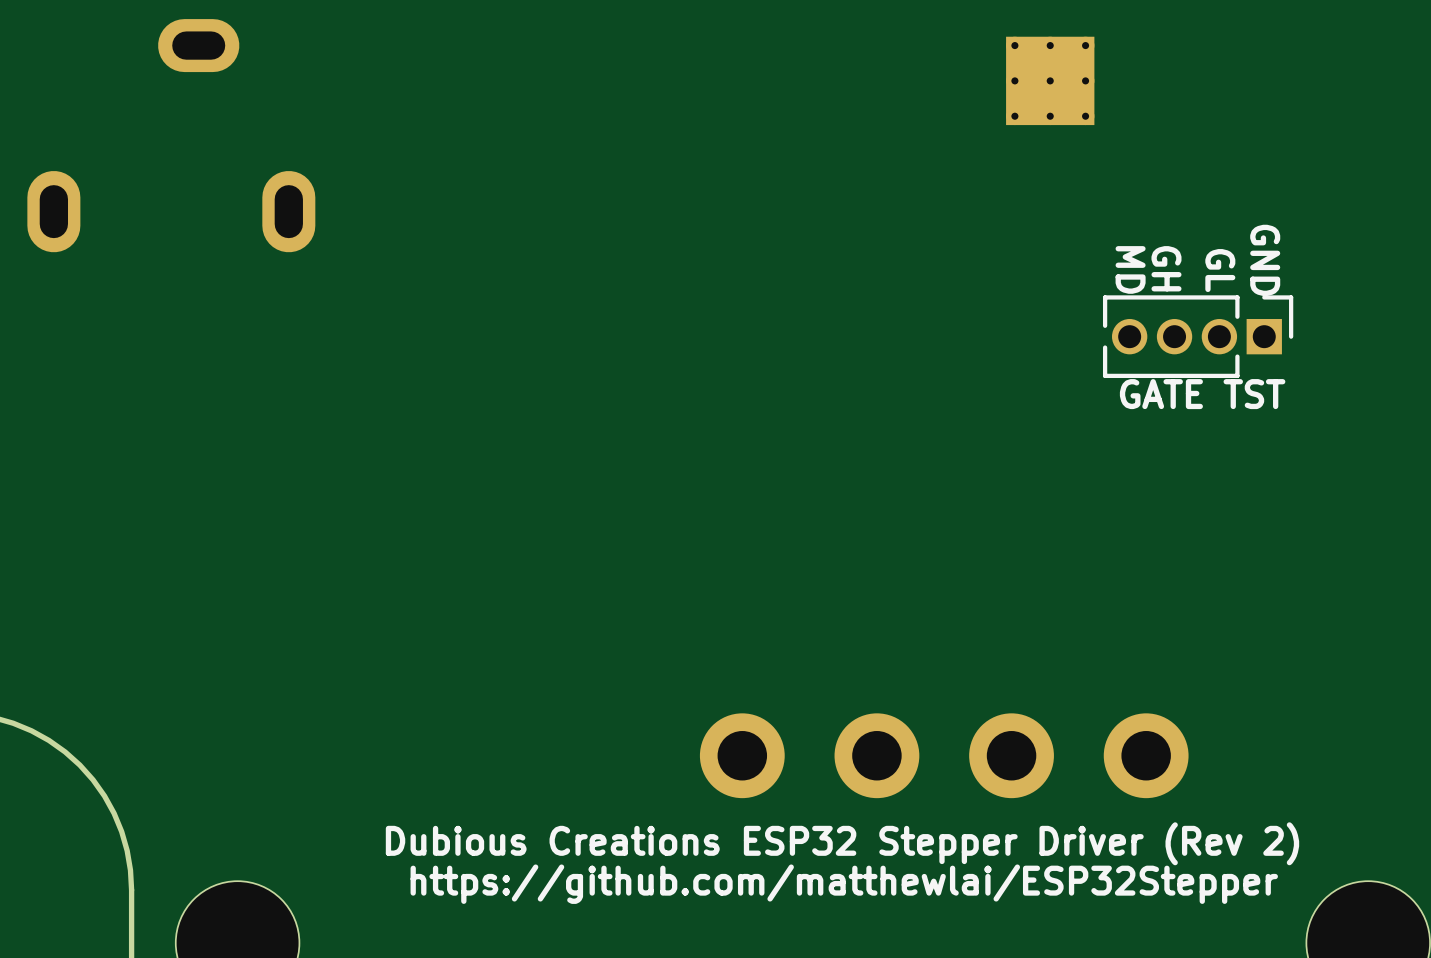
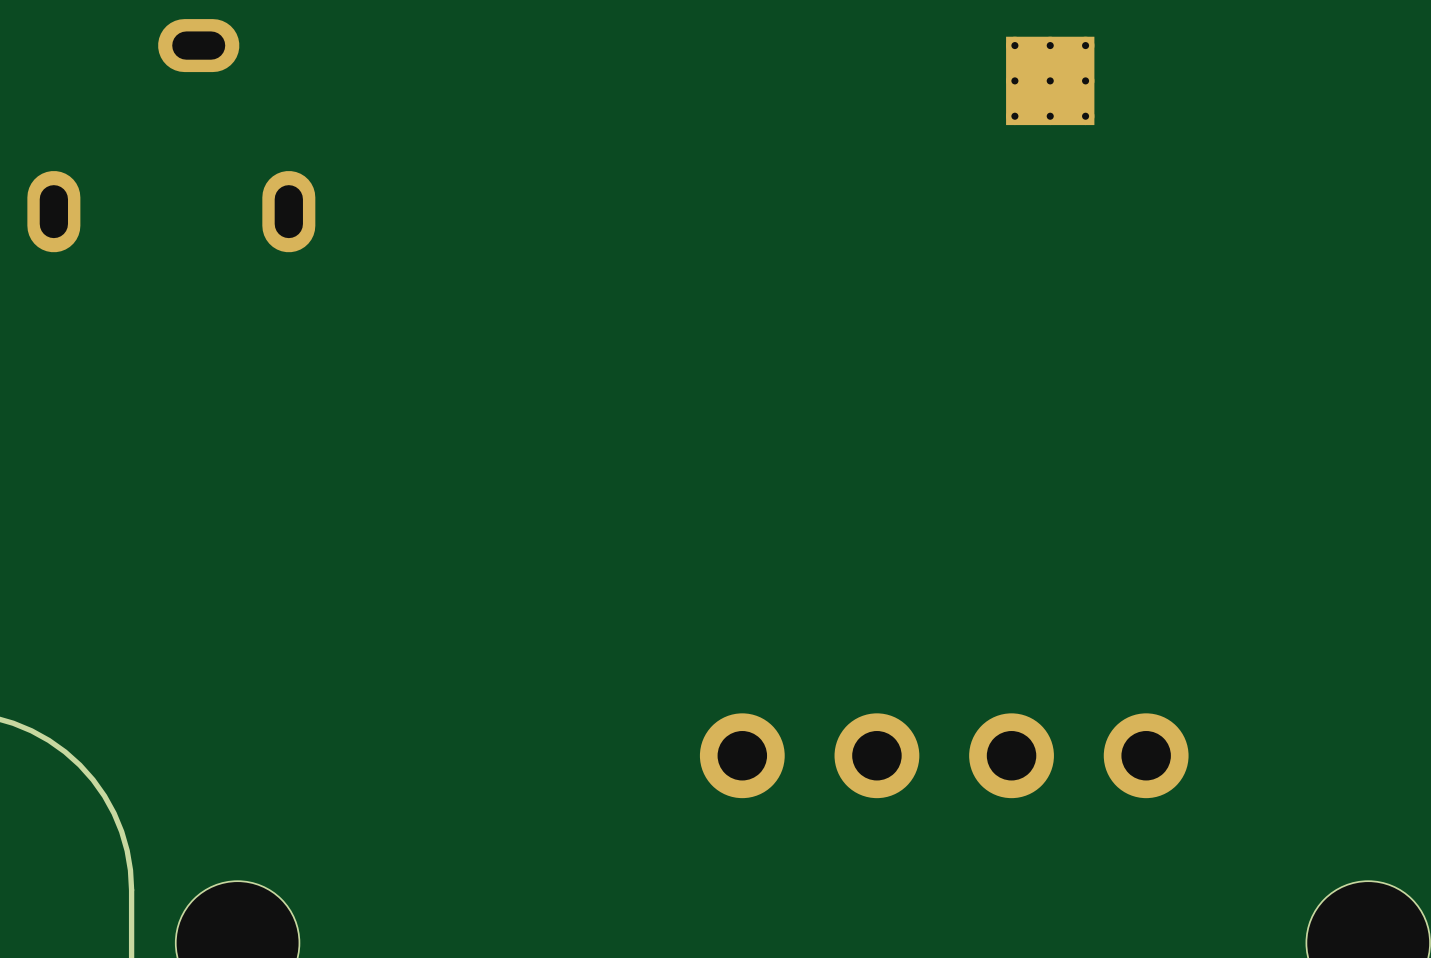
text: GND (1265, 260) -> none
text: GH (1166, 268) -> none
text: MD (1130, 269) -> none
text: GL (1220, 270) -> none
part: (1198, 336) -> none
text: GATE TST (1202, 394) -> none
text: Dubious Creations ESP32 Stepper Driver (Rev 2) (842, 843) -> none
text: https://github.com/matthewlai/ESP32Stepper (844, 884) -> none

